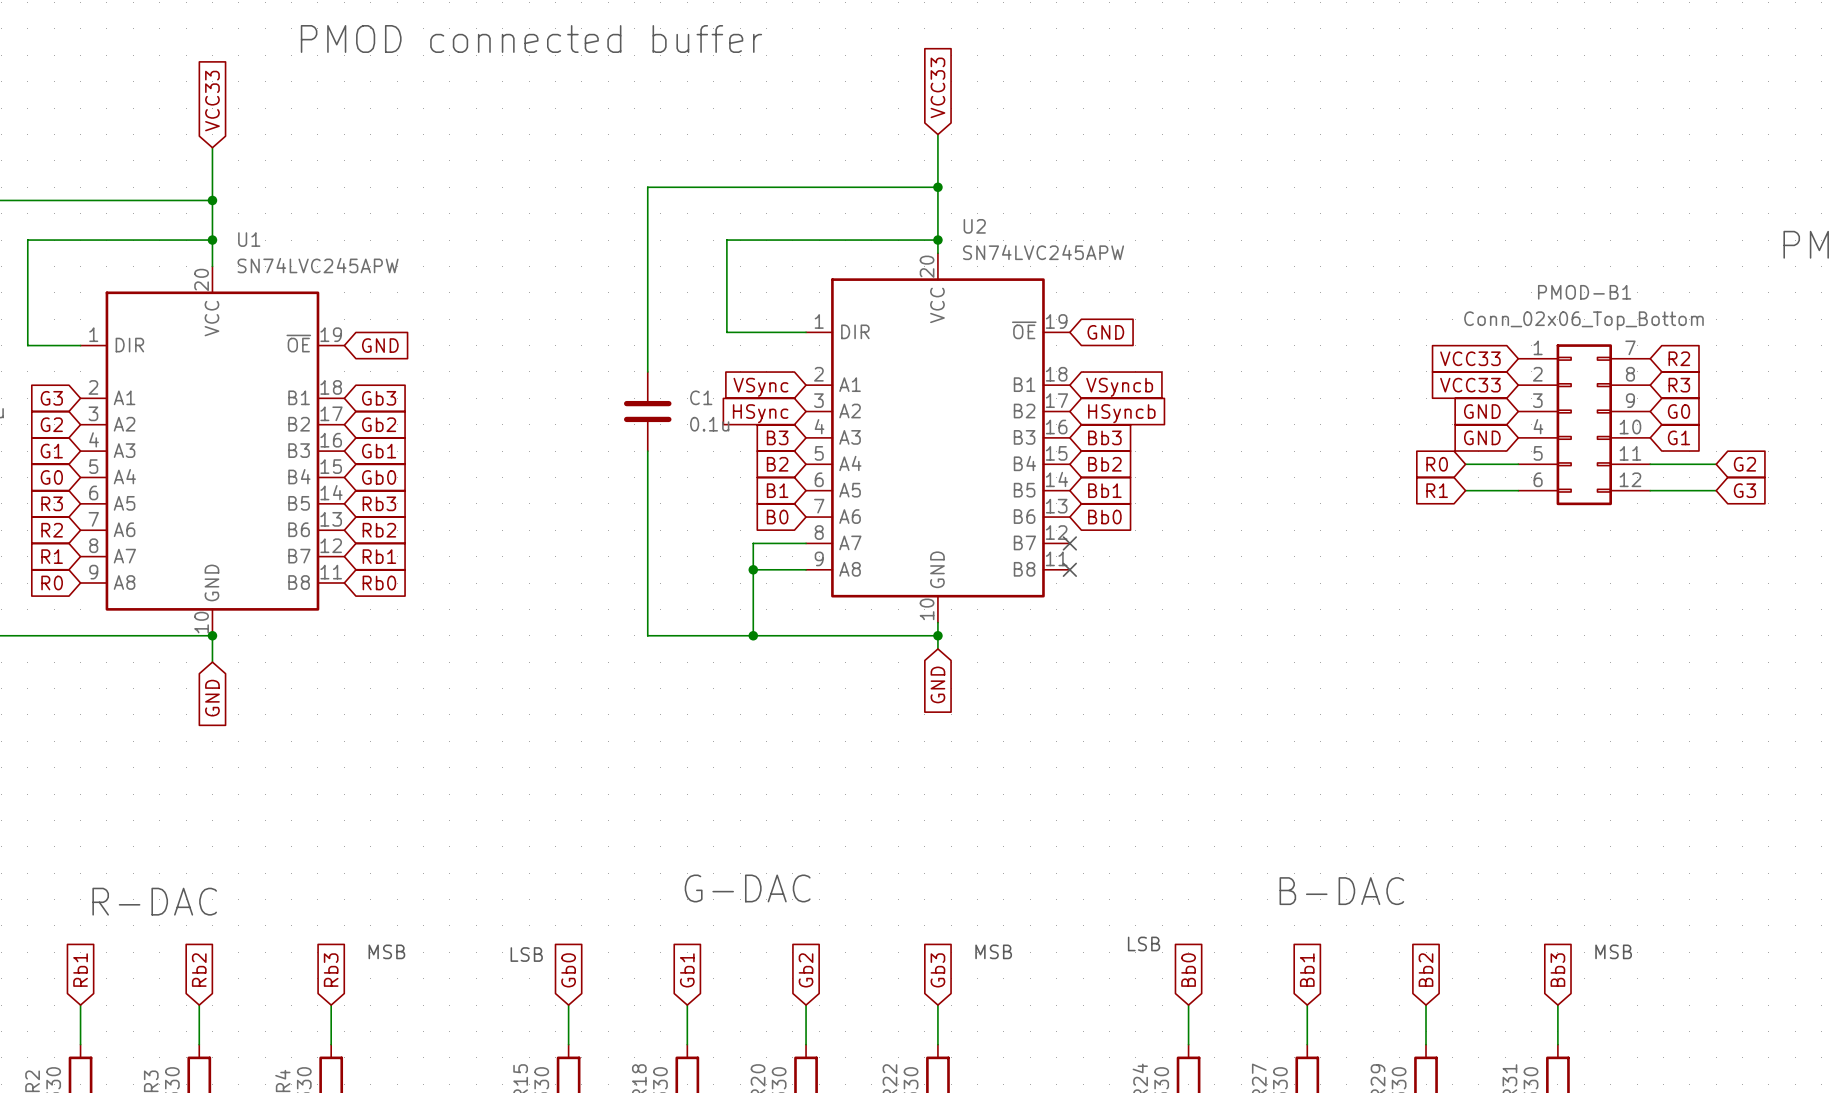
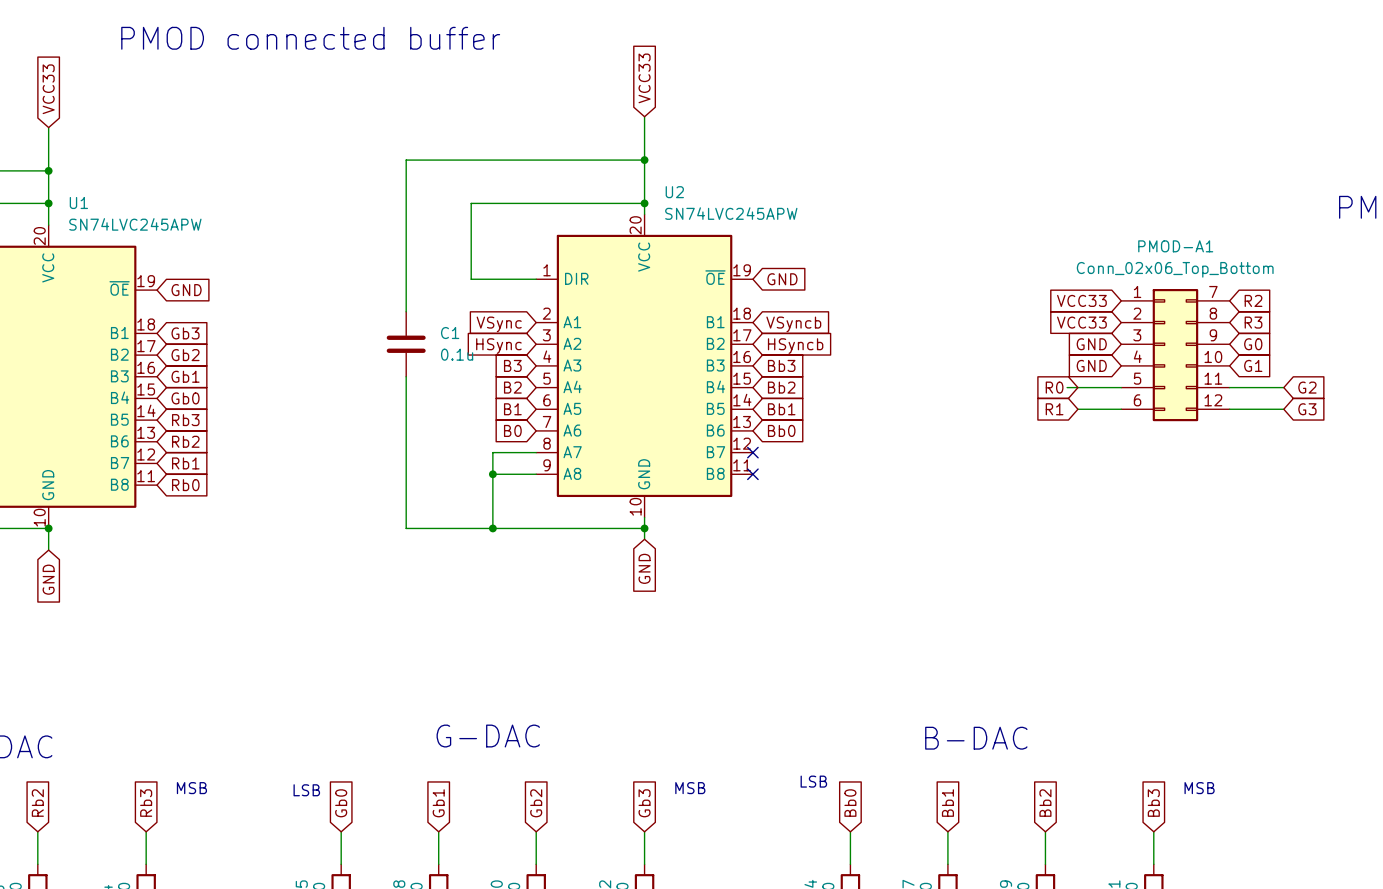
PMOD-B1 name: PMOD-B1 (1584, 292) -> PMOD-A1 (1175, 246)
wire: none -> (1067, 387) (1077, 387)

